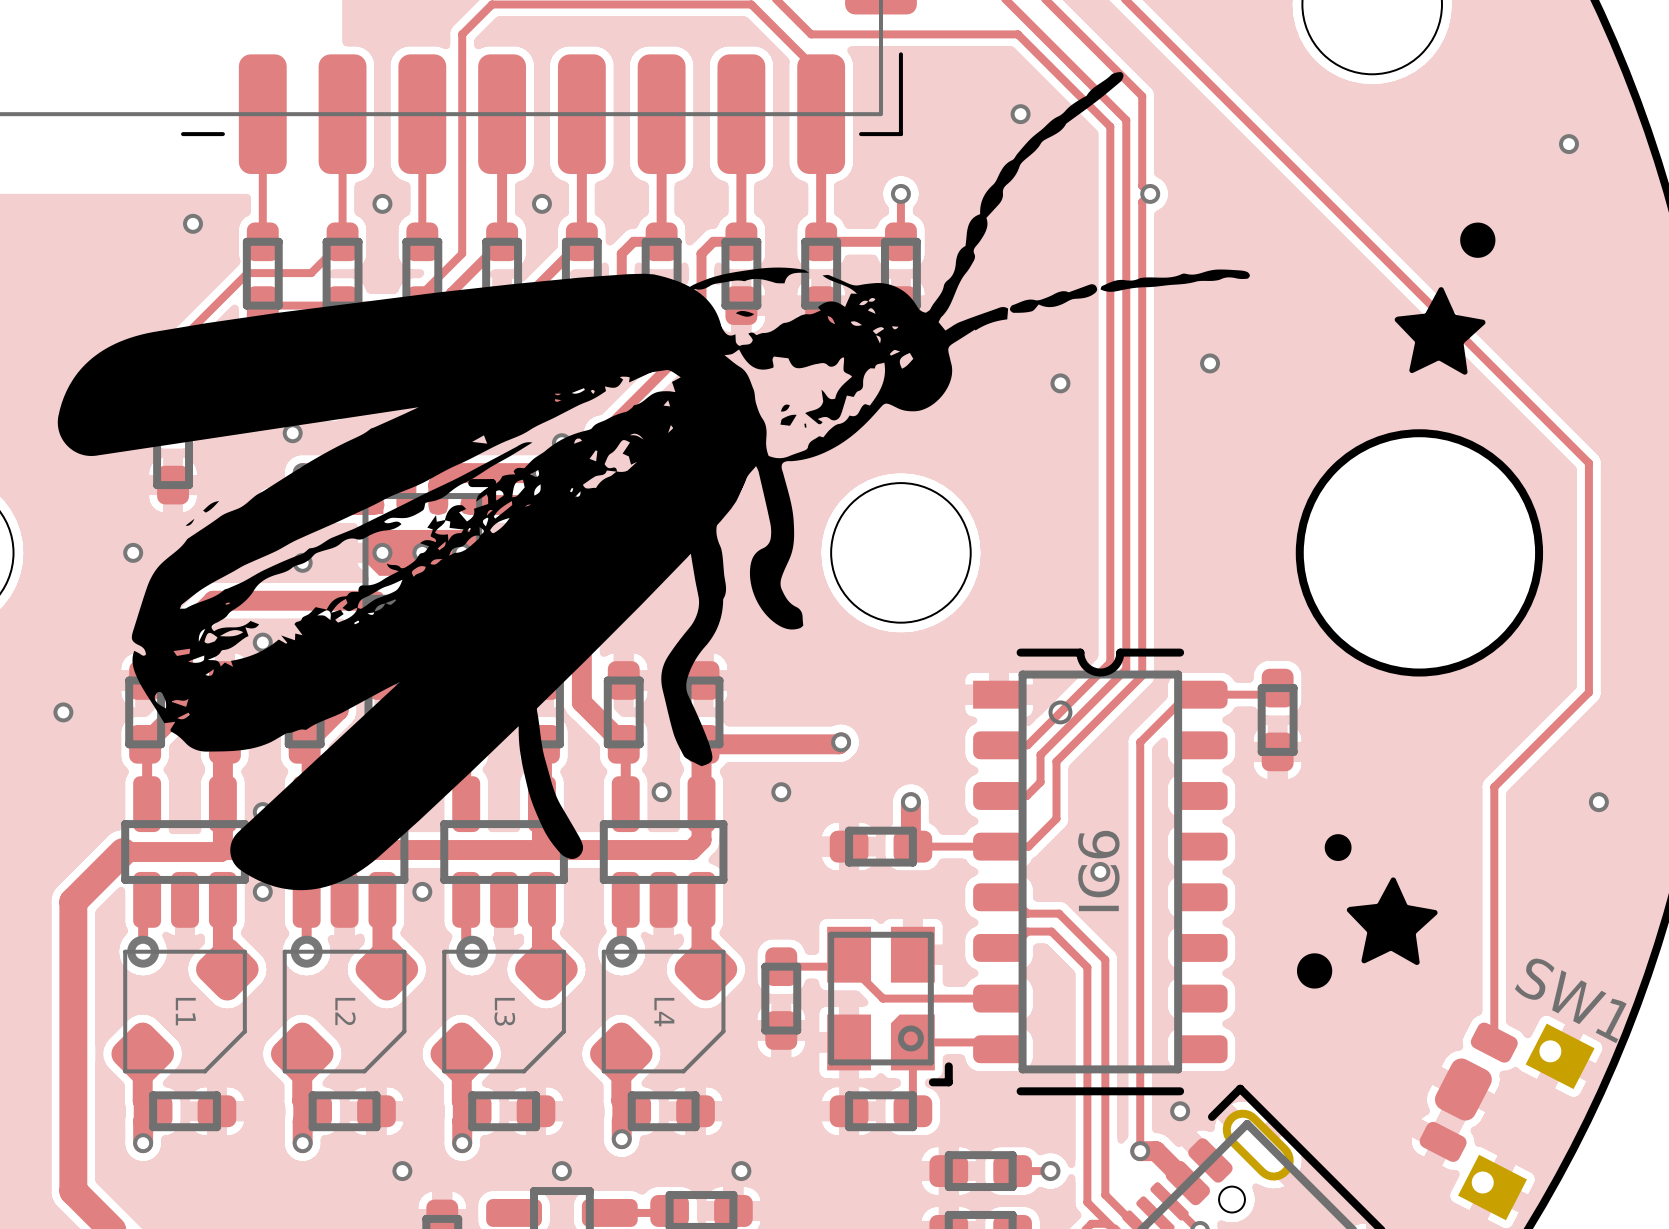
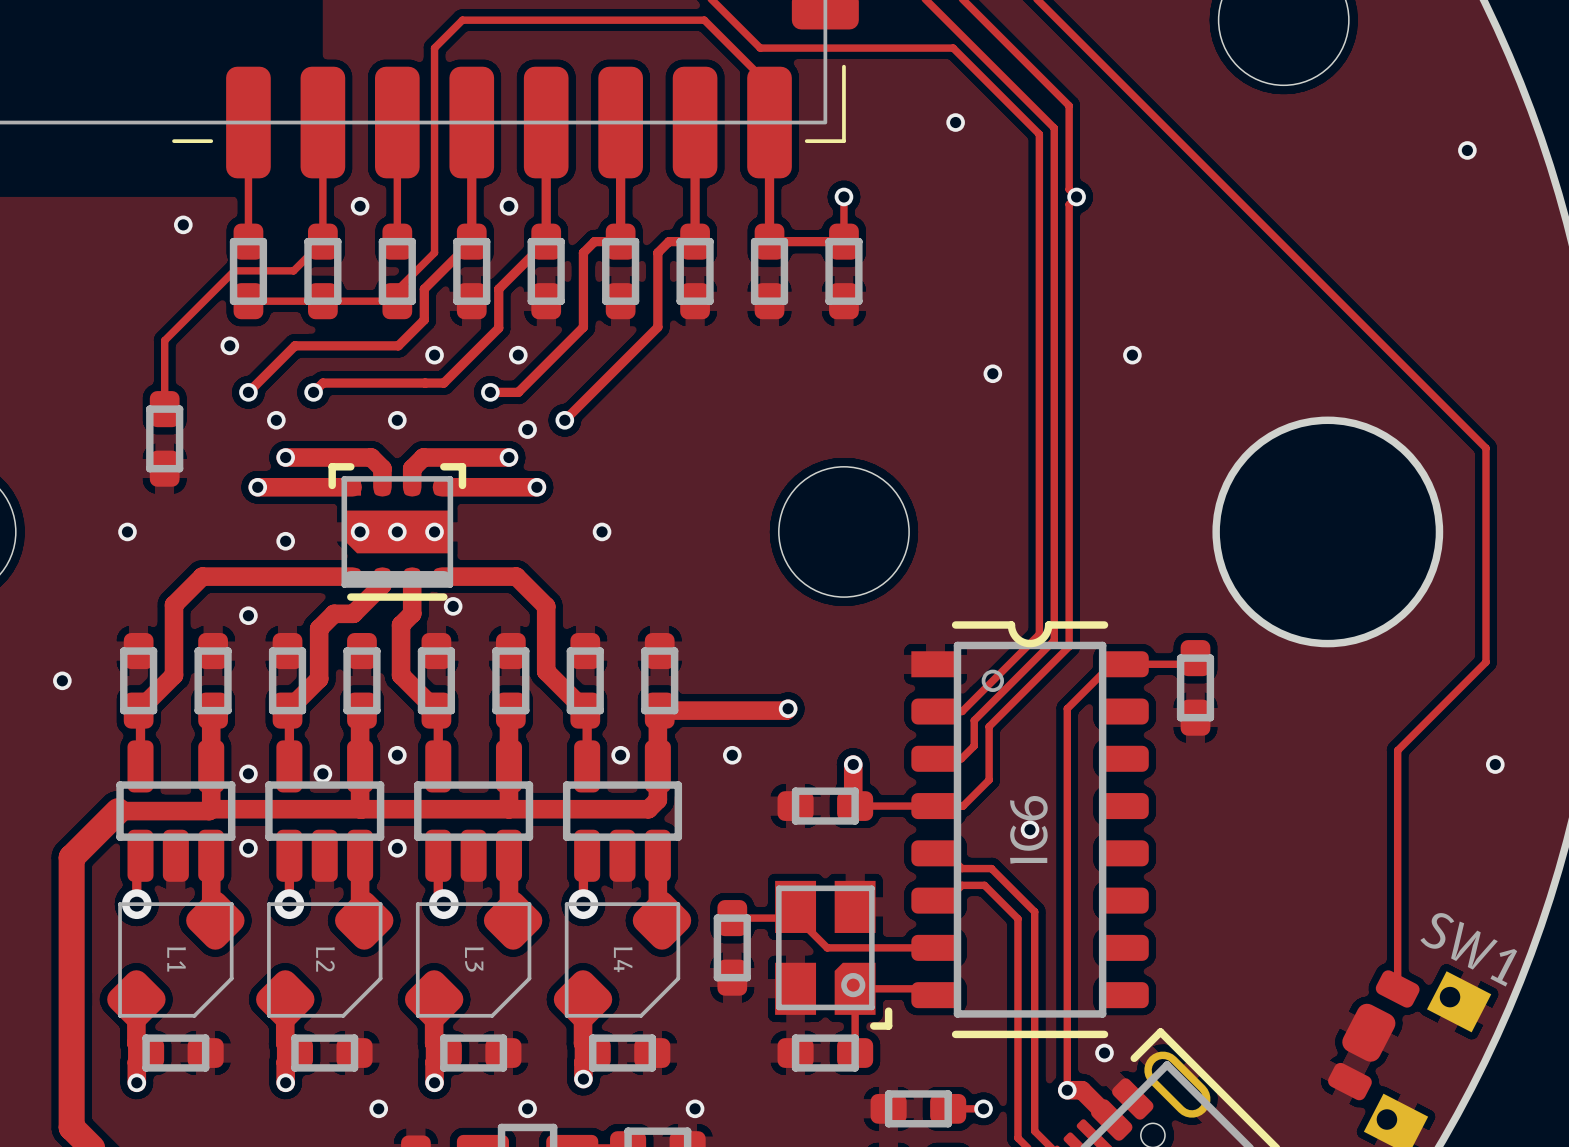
drawing: [57, 72, 1250, 891] -> none
drawing: [1394, 222, 1496, 375] -> none
drawing: [1296, 834, 1438, 989] -> none

